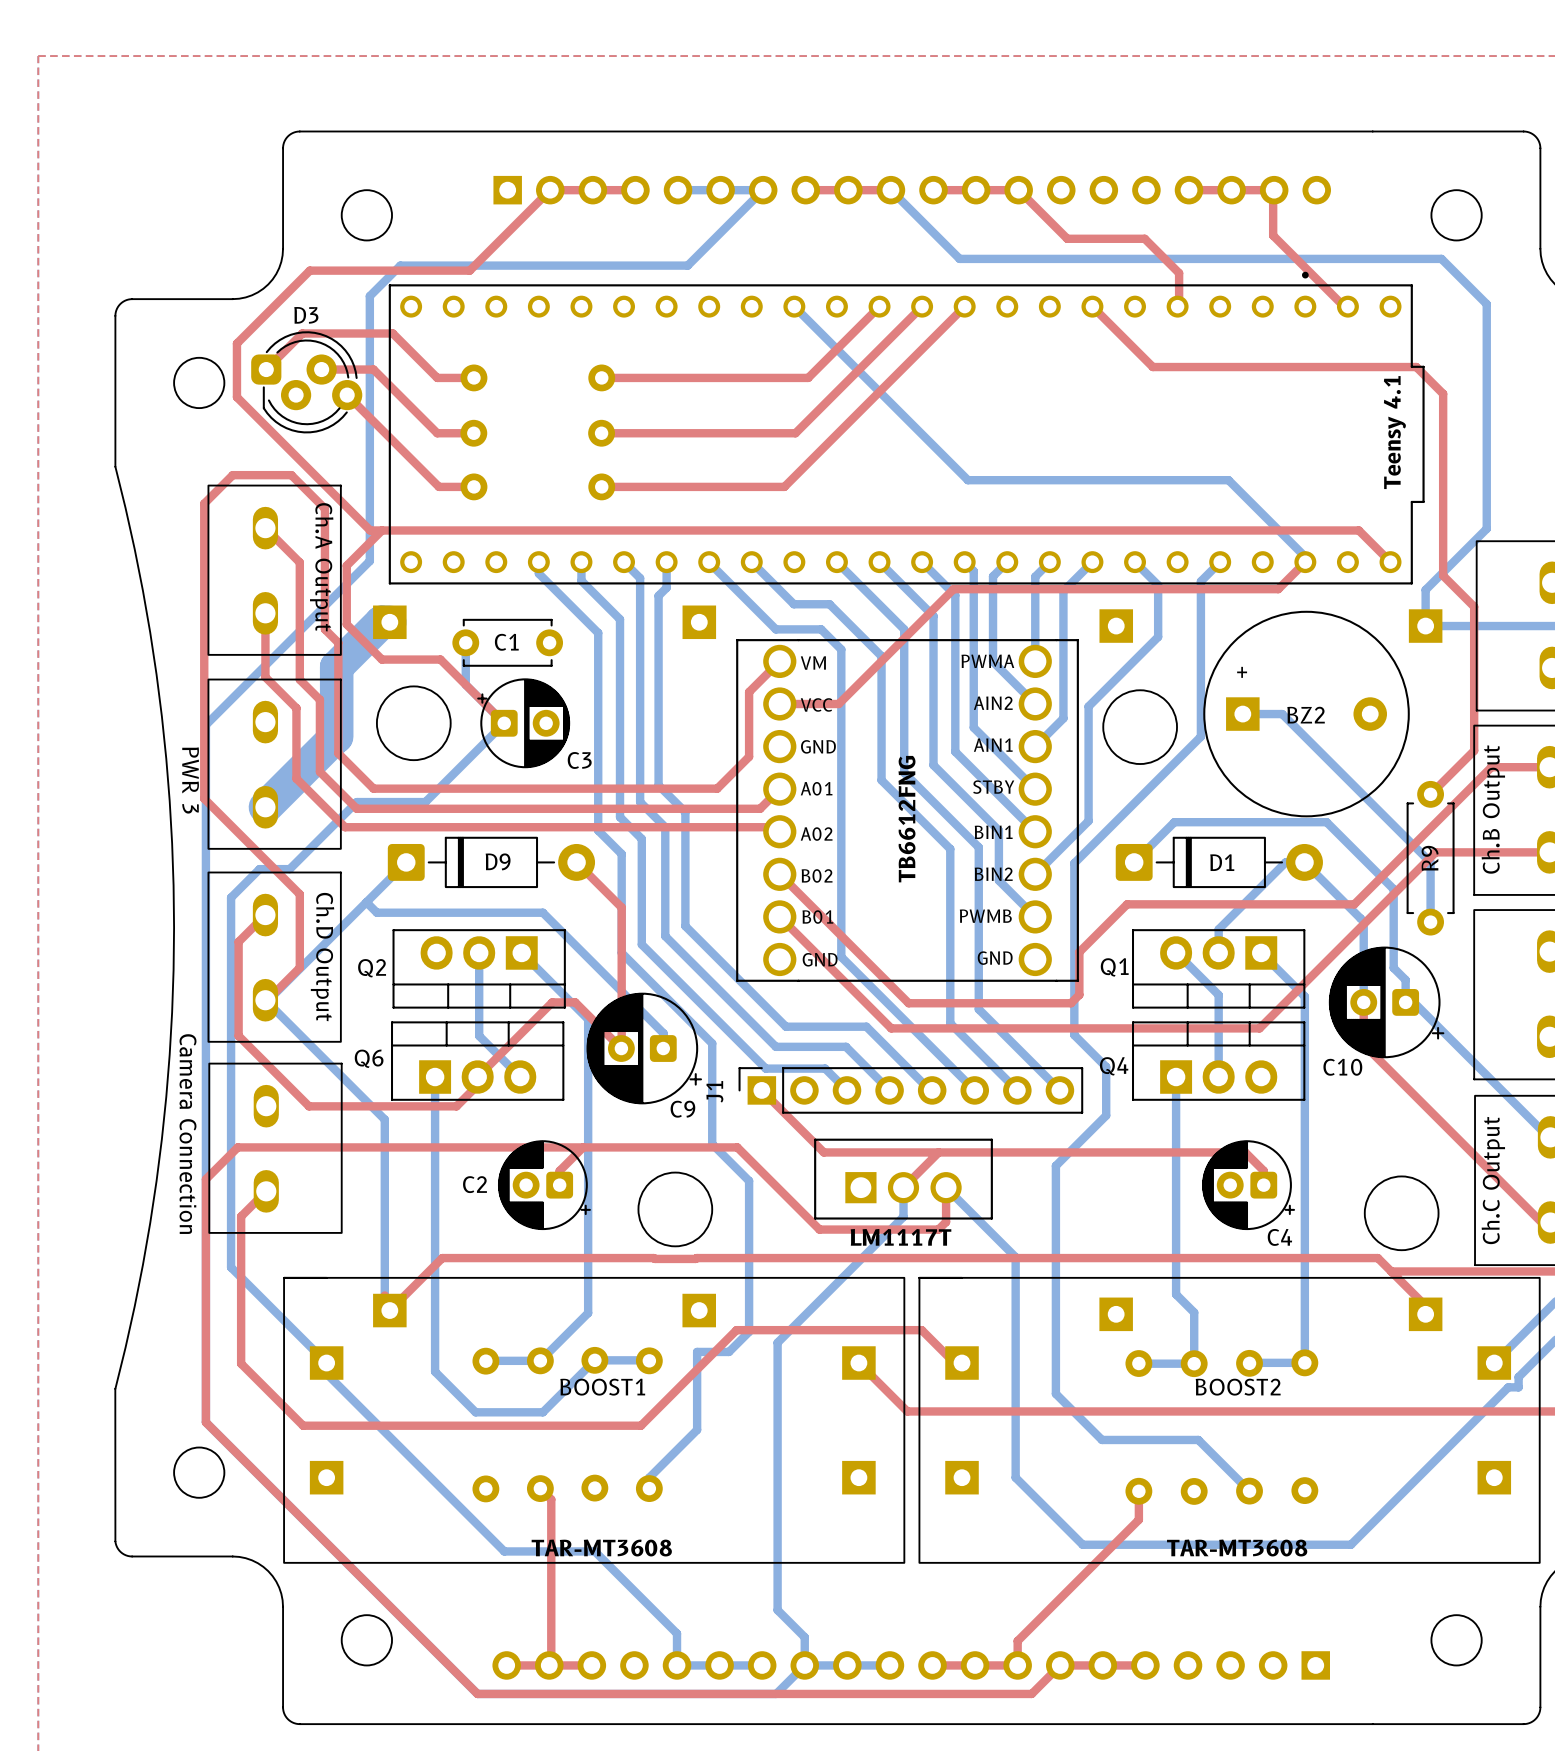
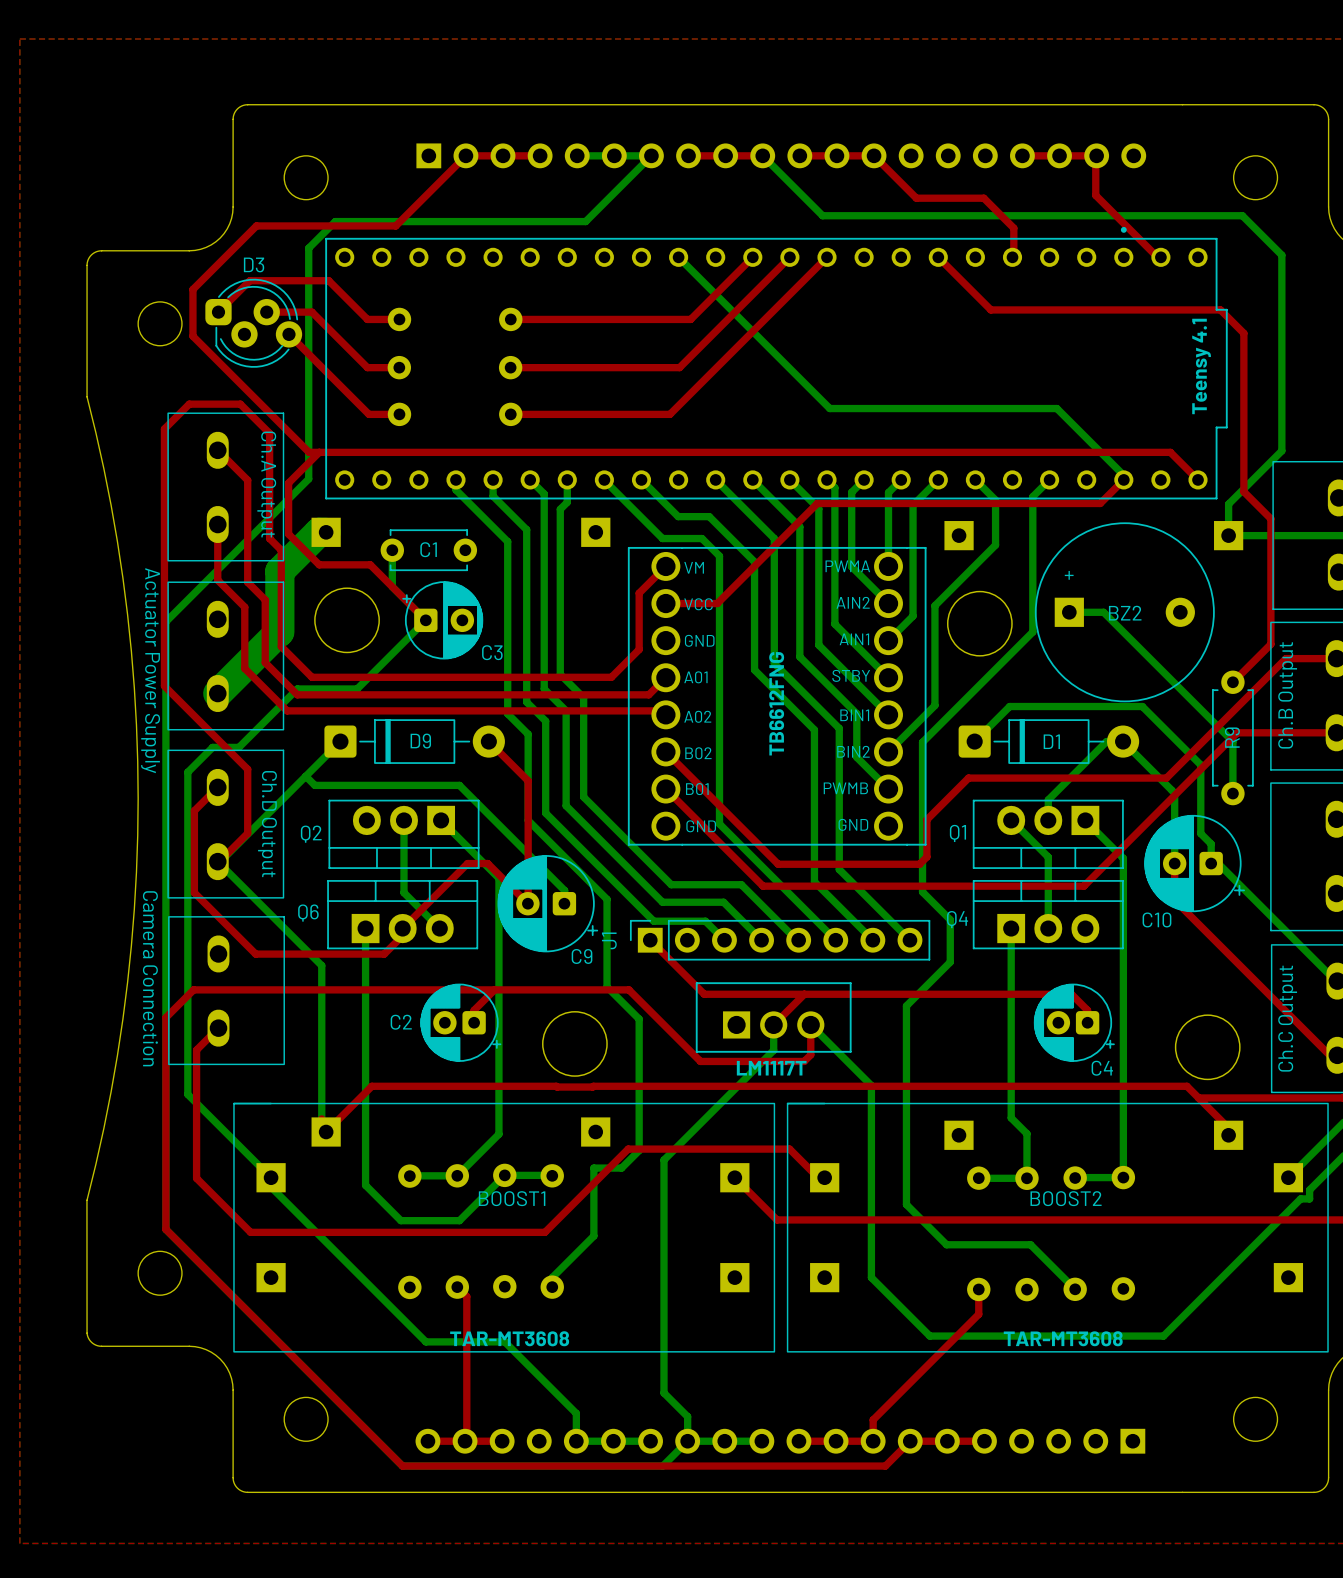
part value: PWR 3 (190, 780) -> Actuator Power Supply (150, 670)

